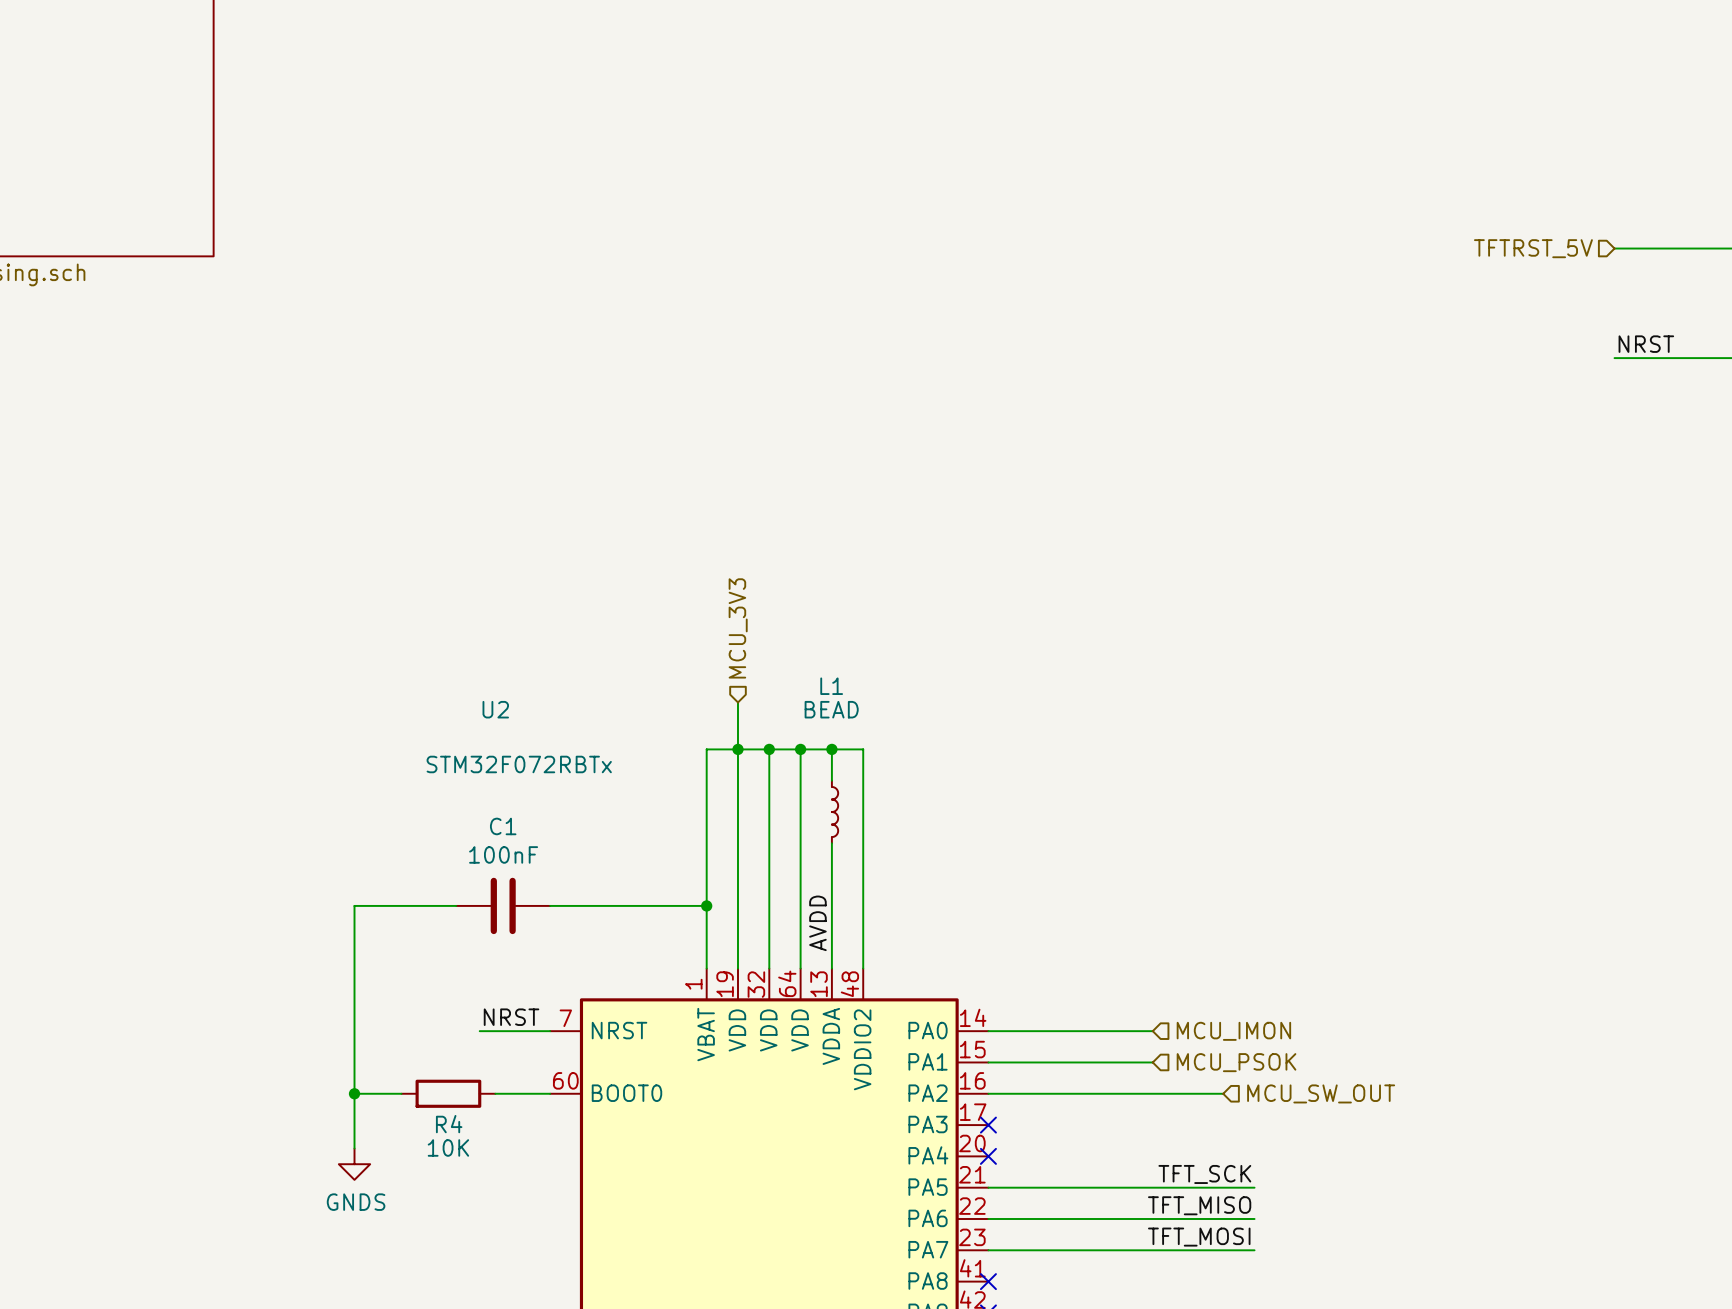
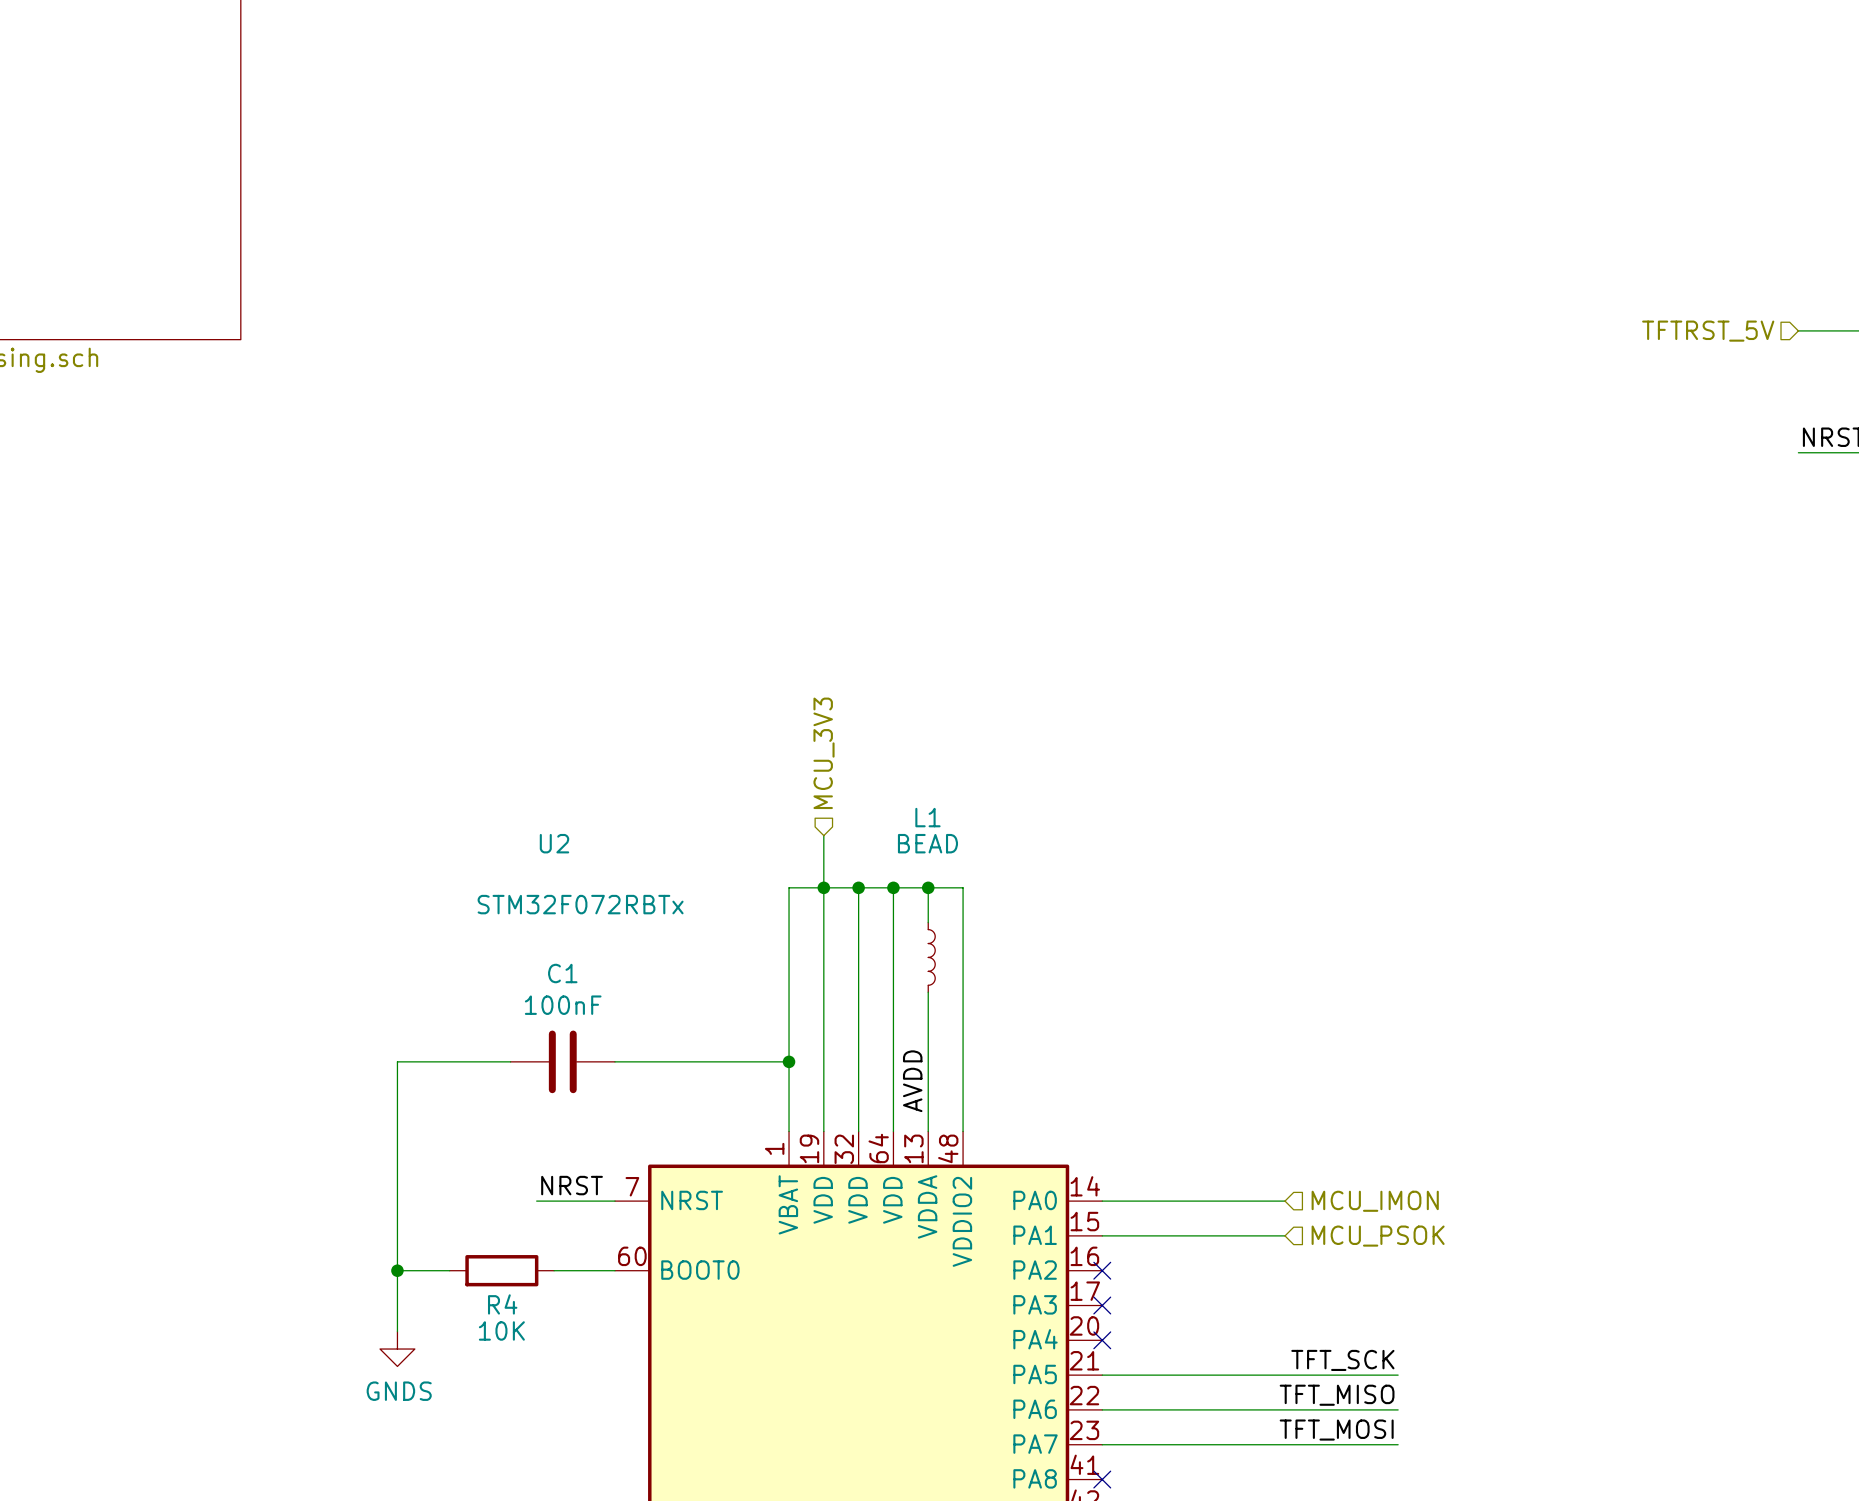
wire: (988, 1093) (1223, 1093) -> none
no-connect mark: none -> (1102, 1270)
hierarchical label: MCU_SW_OUT (1321, 1093) -> none

